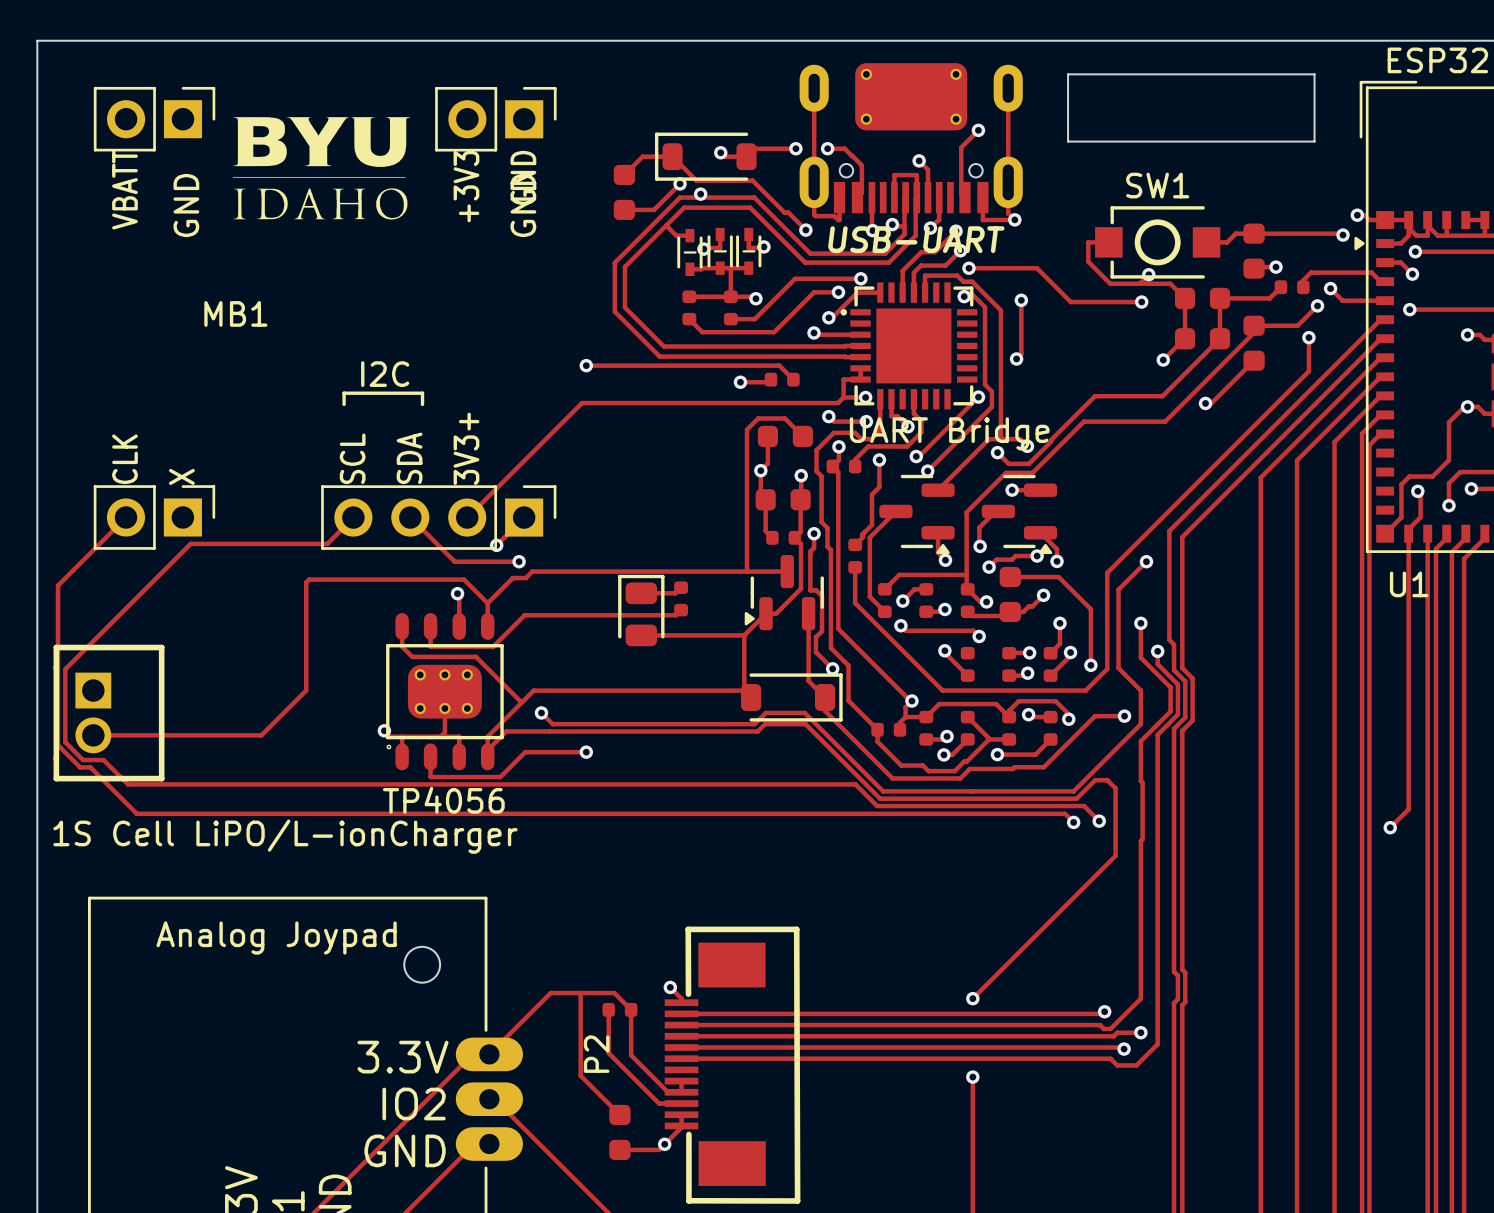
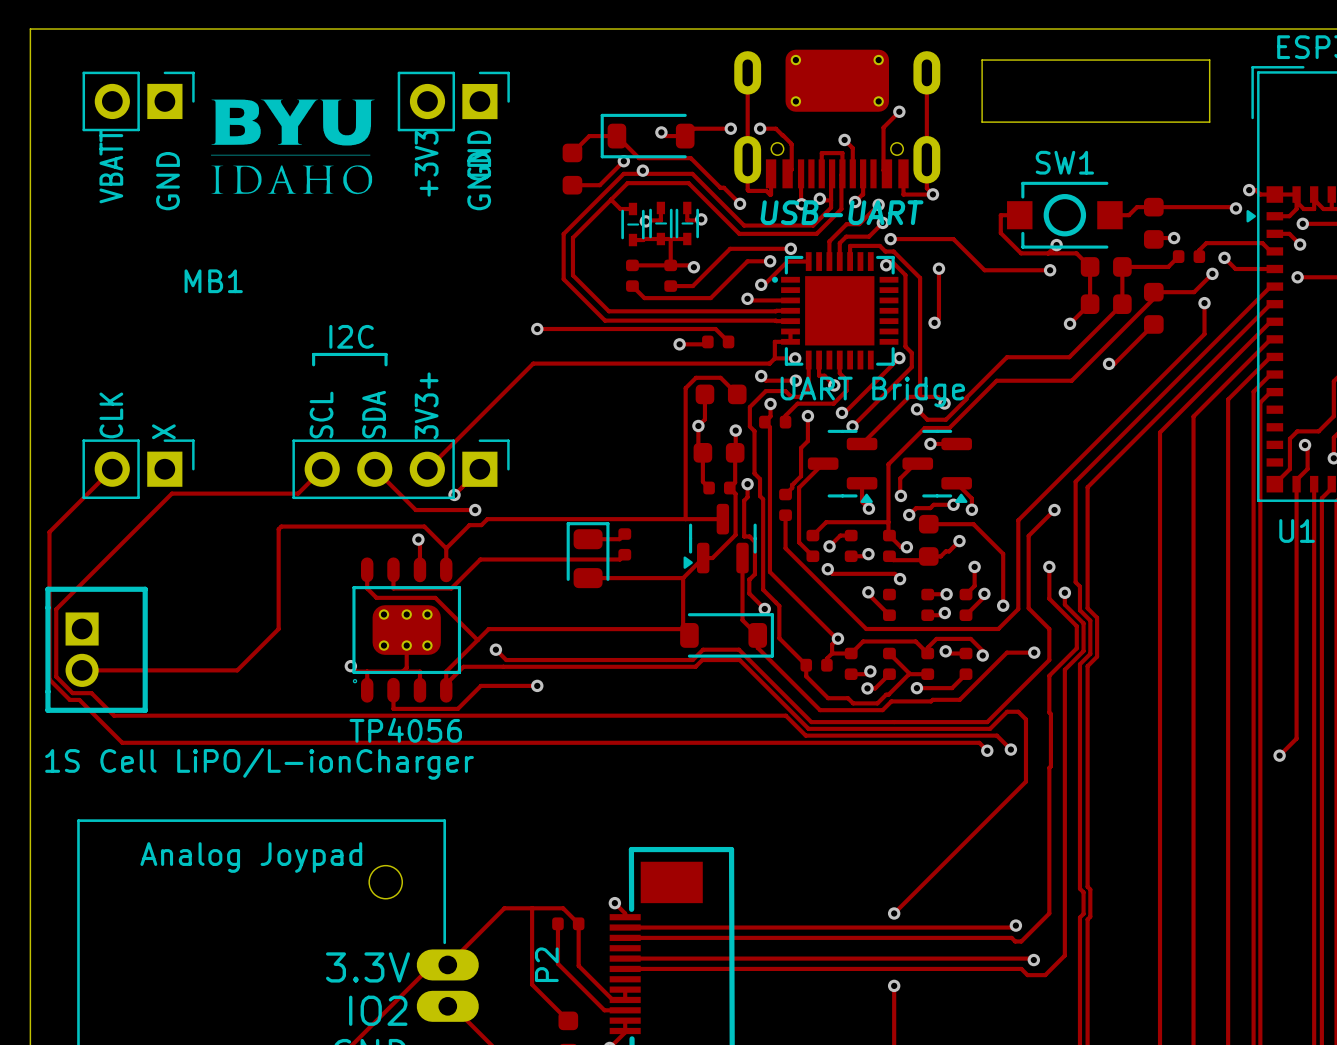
track: (1140, 1032) (1117, 1032) (1113, 1036) (681, 1036) -> none
via: (1140, 1032) -> none

